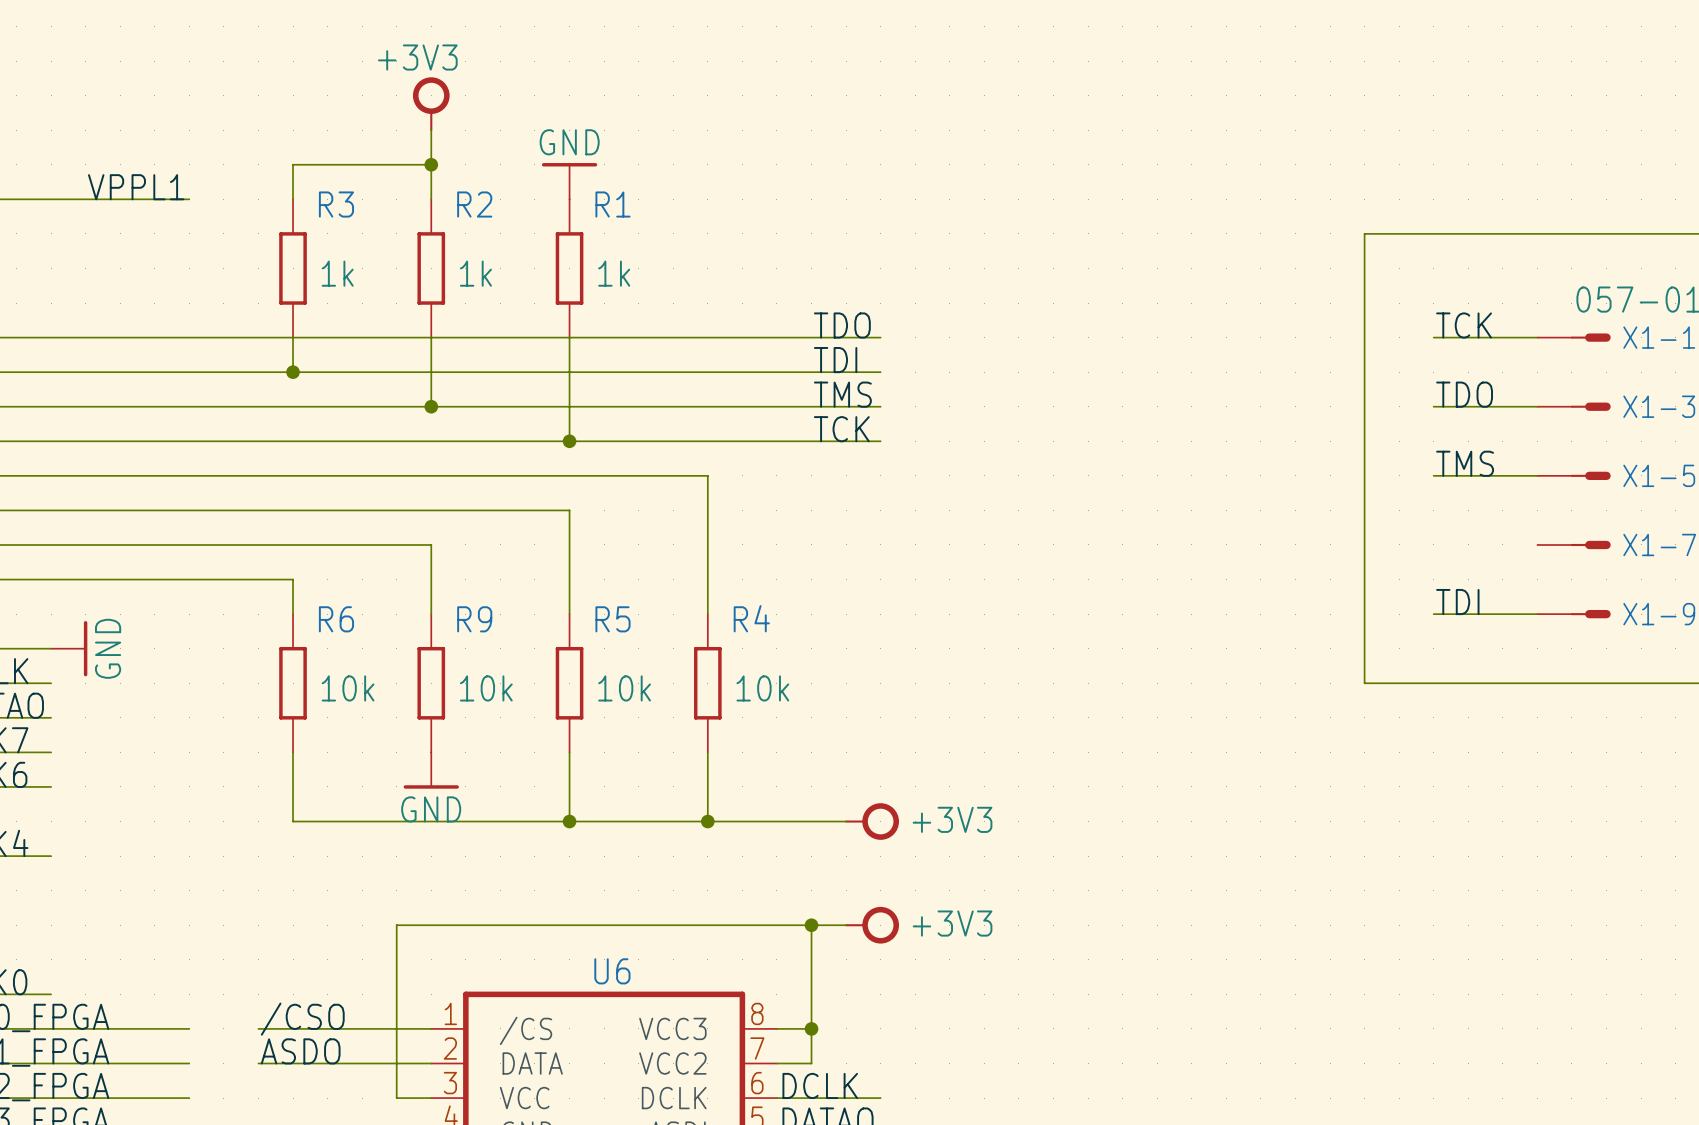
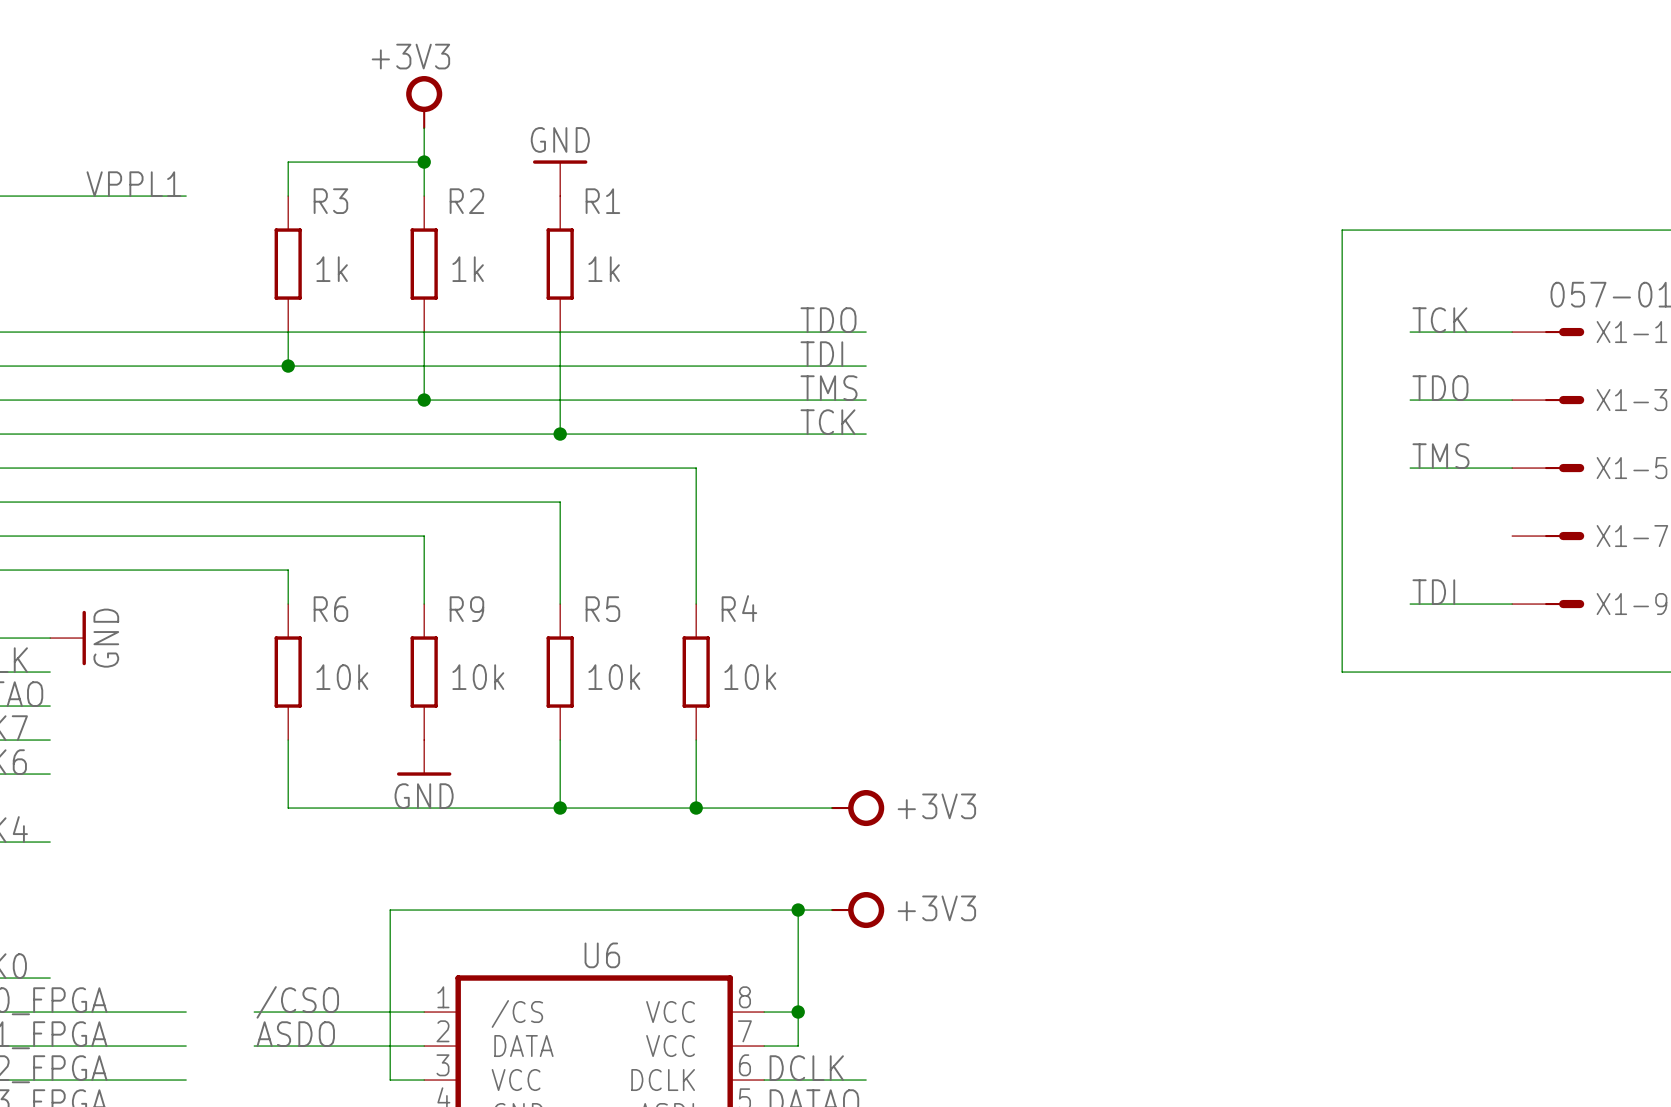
U6 pin name: VCC3 (672, 1028) -> VCC (670, 1012)
U6 pin name: VCC2 (672, 1063) -> VCC (670, 1046)

